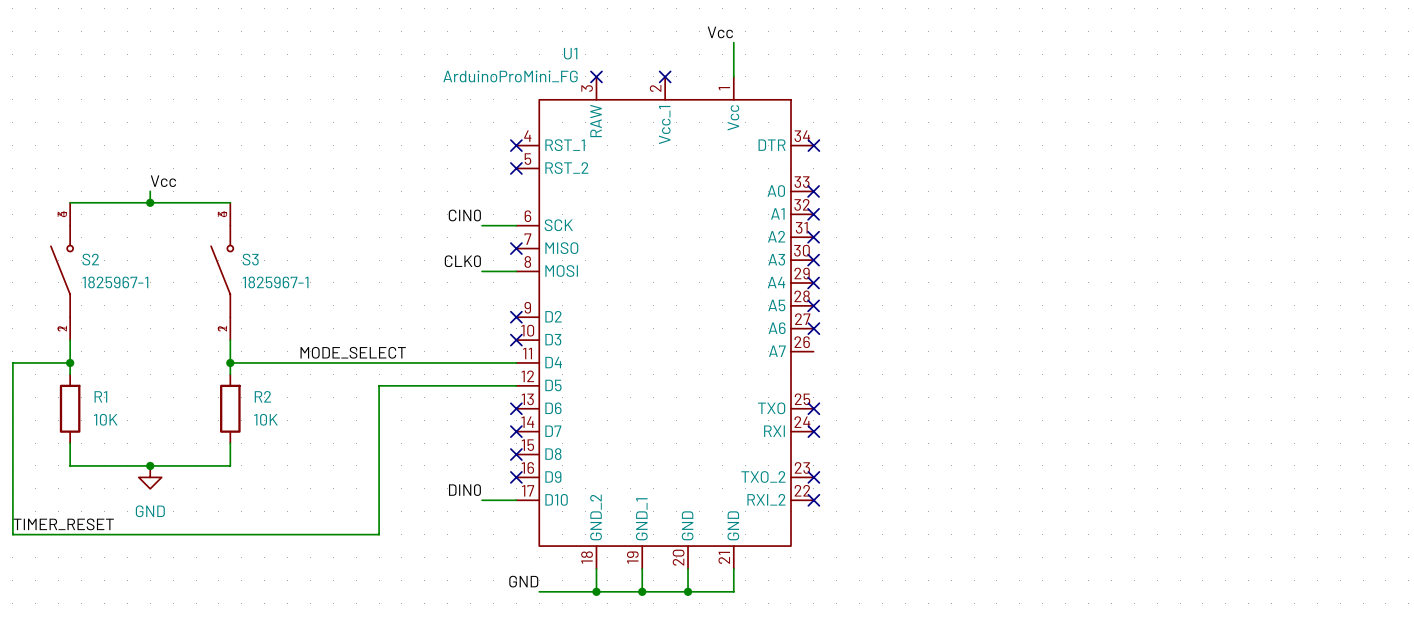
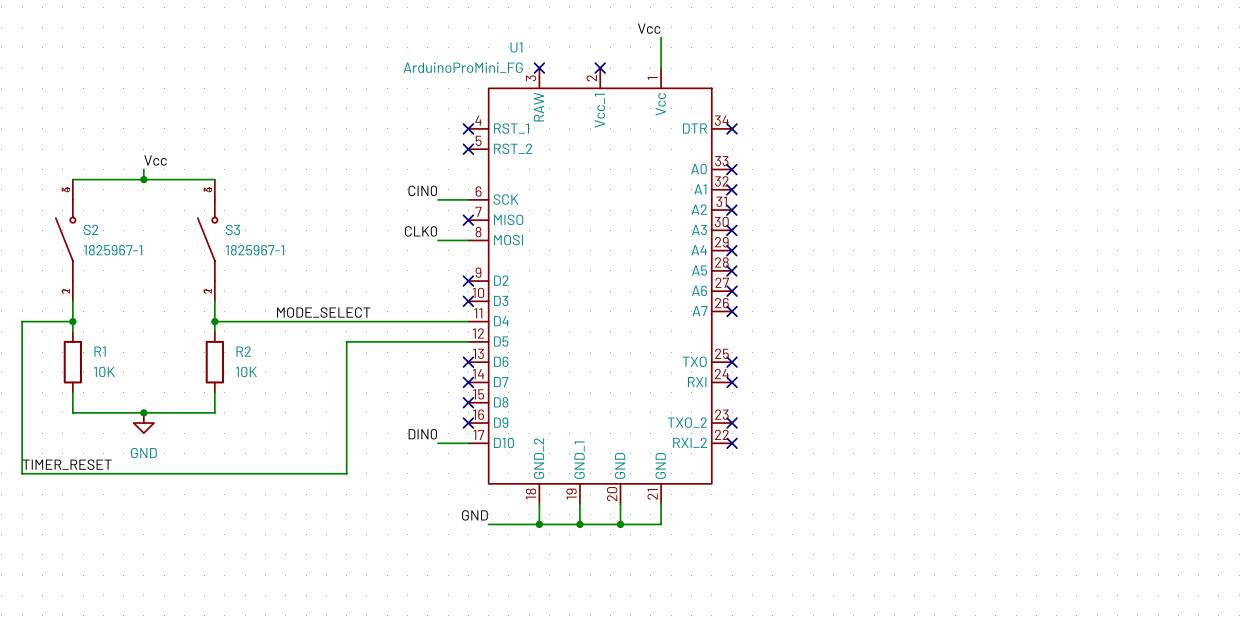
U1 symbol: [516, 76, 814, 569] -> [468, 68, 733, 505]
no-connect mark: none -> (732, 311)

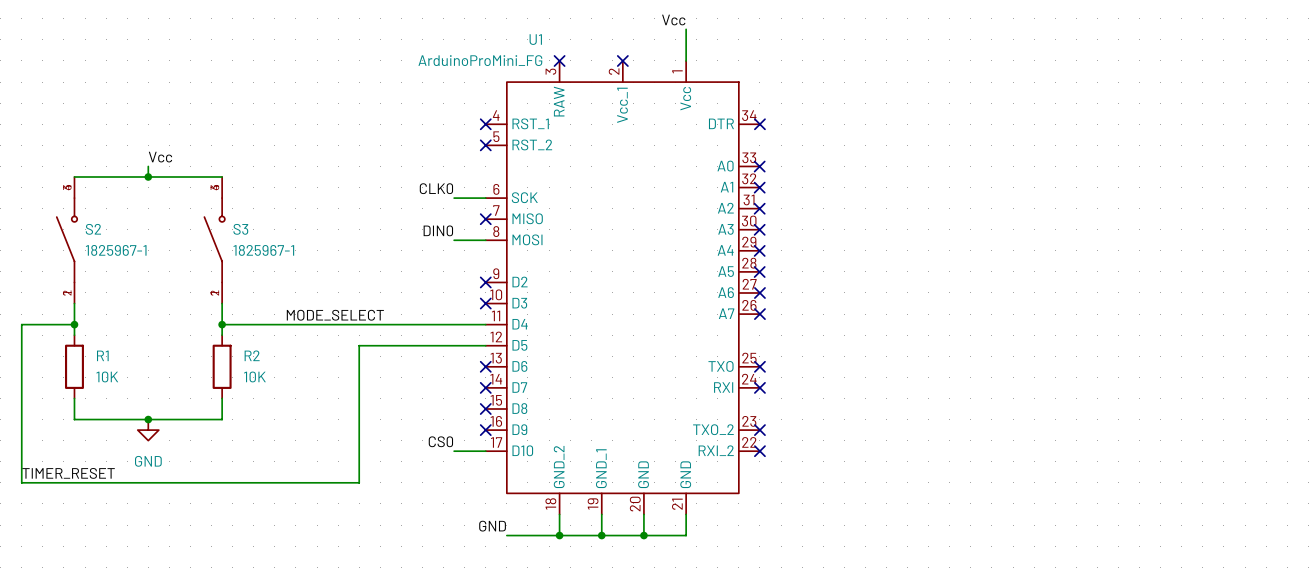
label: CIN0 (422, 190) -> CLK0 (436, 188)
label: CLK0 (420, 231) -> DIN0 (438, 230)
label: DIN0 (422, 434) -> CS0 (440, 441)

